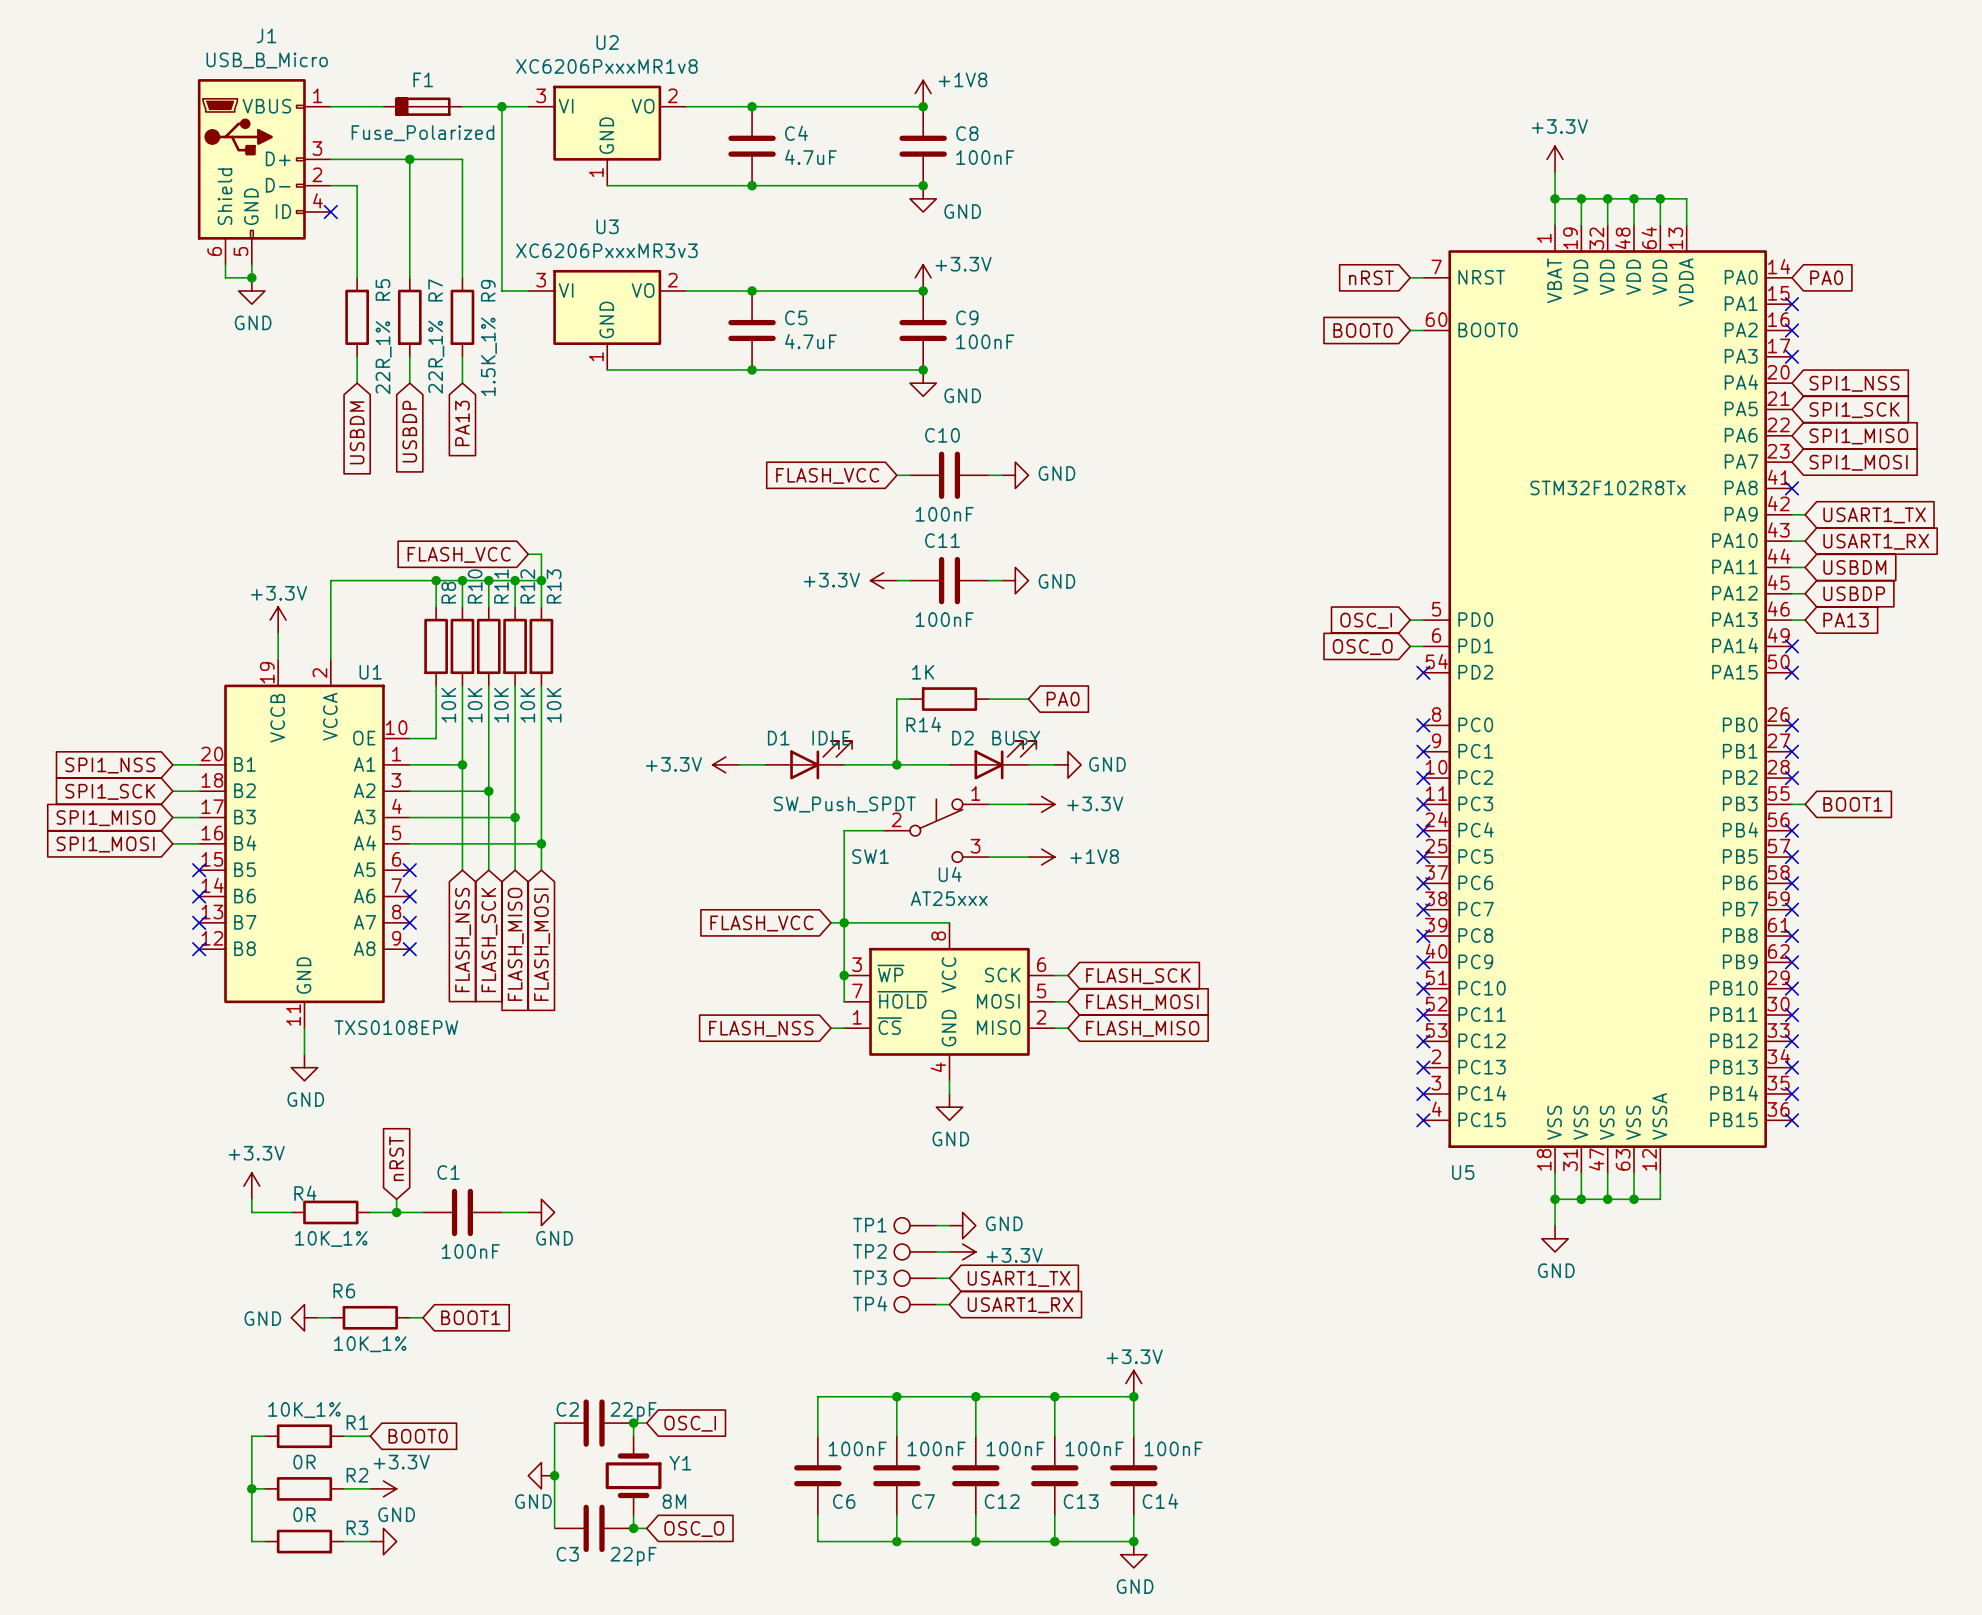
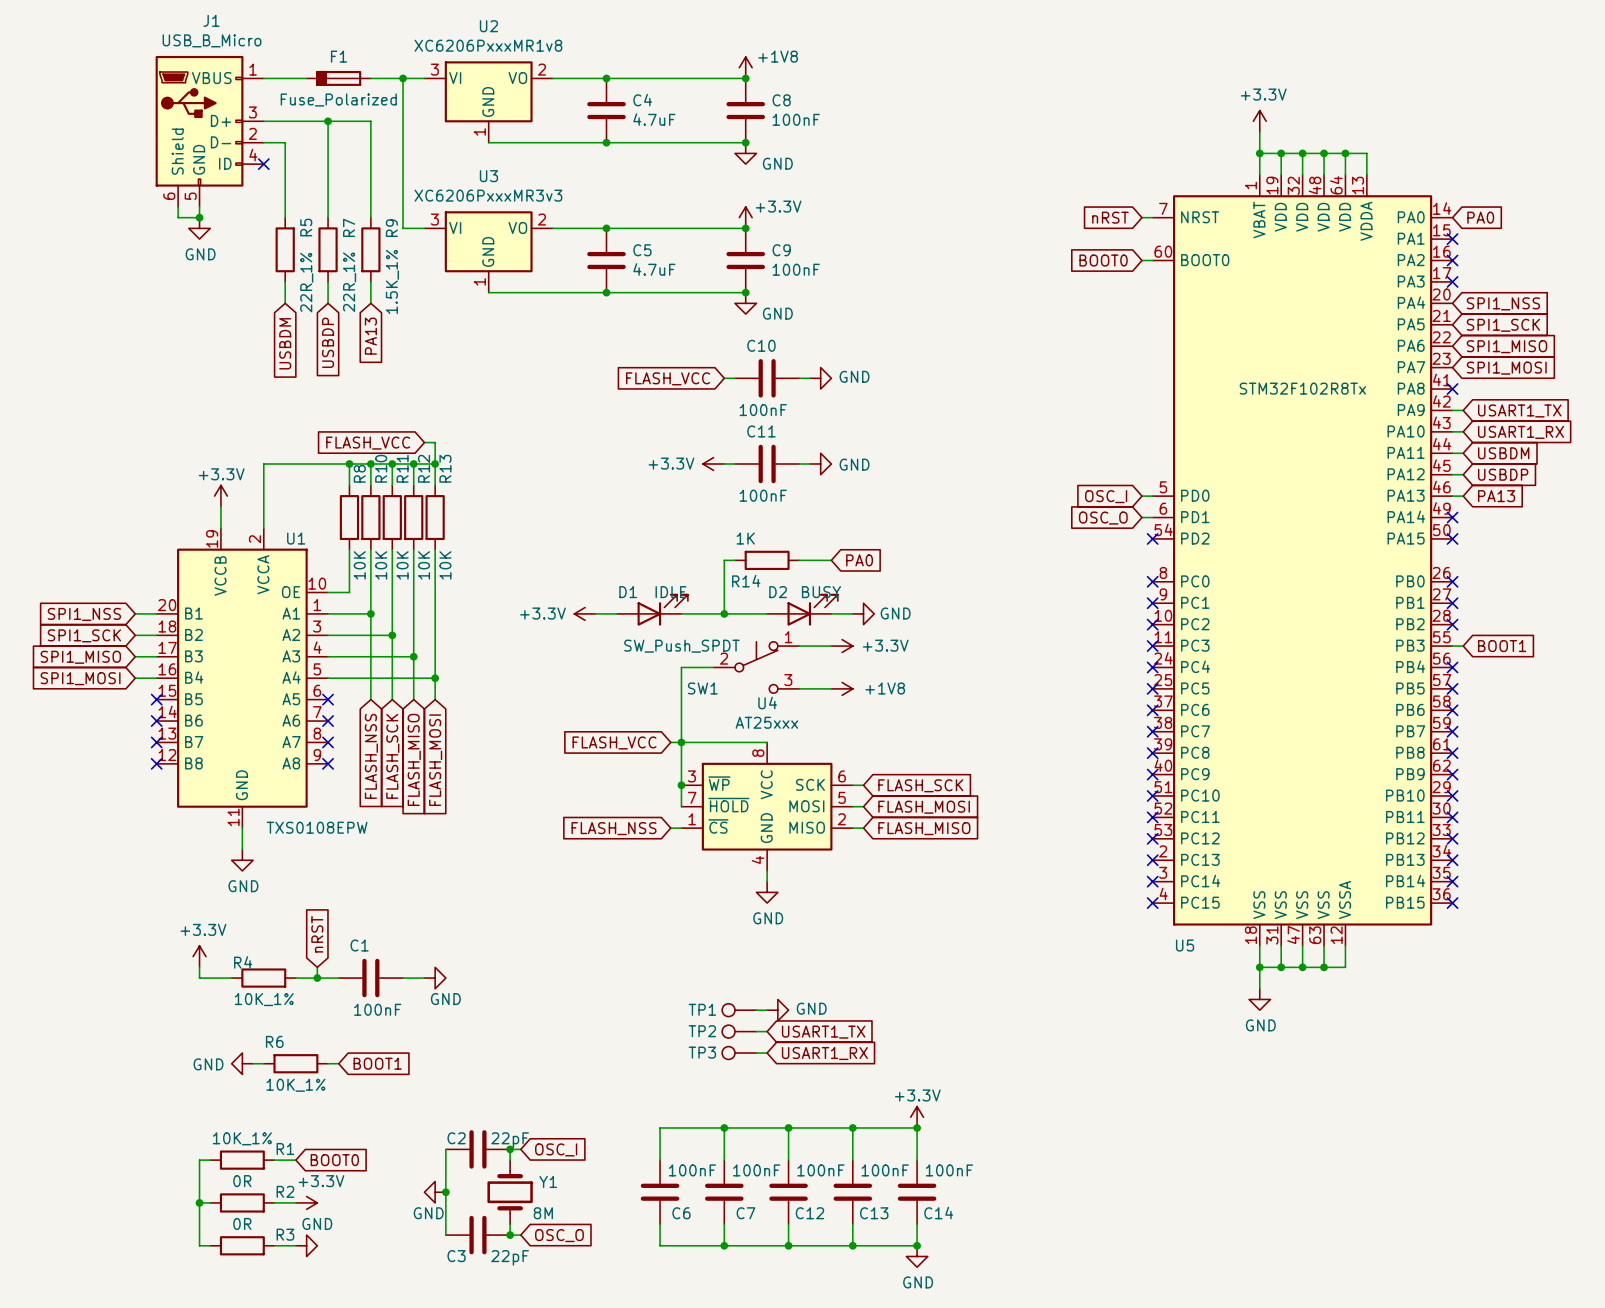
TP1: (915, 1225) -> none
wire: (936, 1225) (949, 1225) -> none
power symbol: GND (962, 1225) -> none
TP2 name: TP2 (869, 1251) -> TP1 (702, 1009)
power symbol: +3.3V (962, 1251) -> GND (777, 1010)
TP3 name: TP3 (869, 1277) -> TP2 (702, 1031)
TP4 name: TP4 (870, 1303) -> TP3 (702, 1052)

